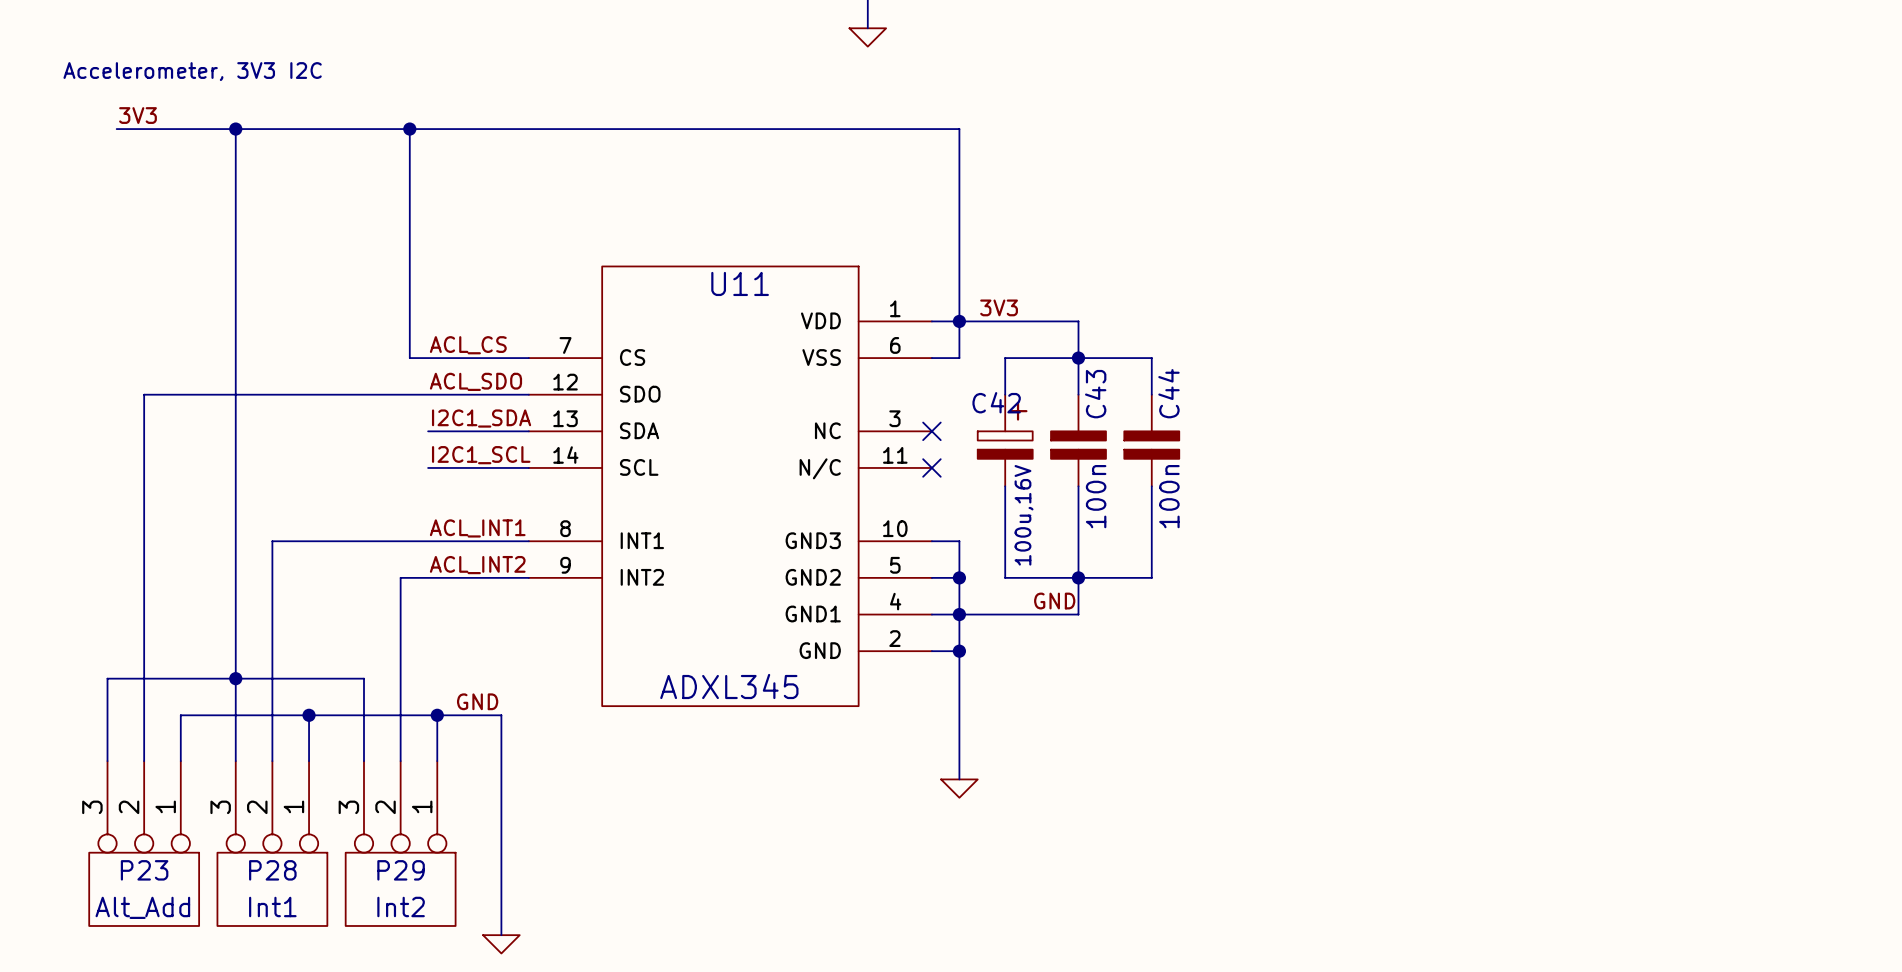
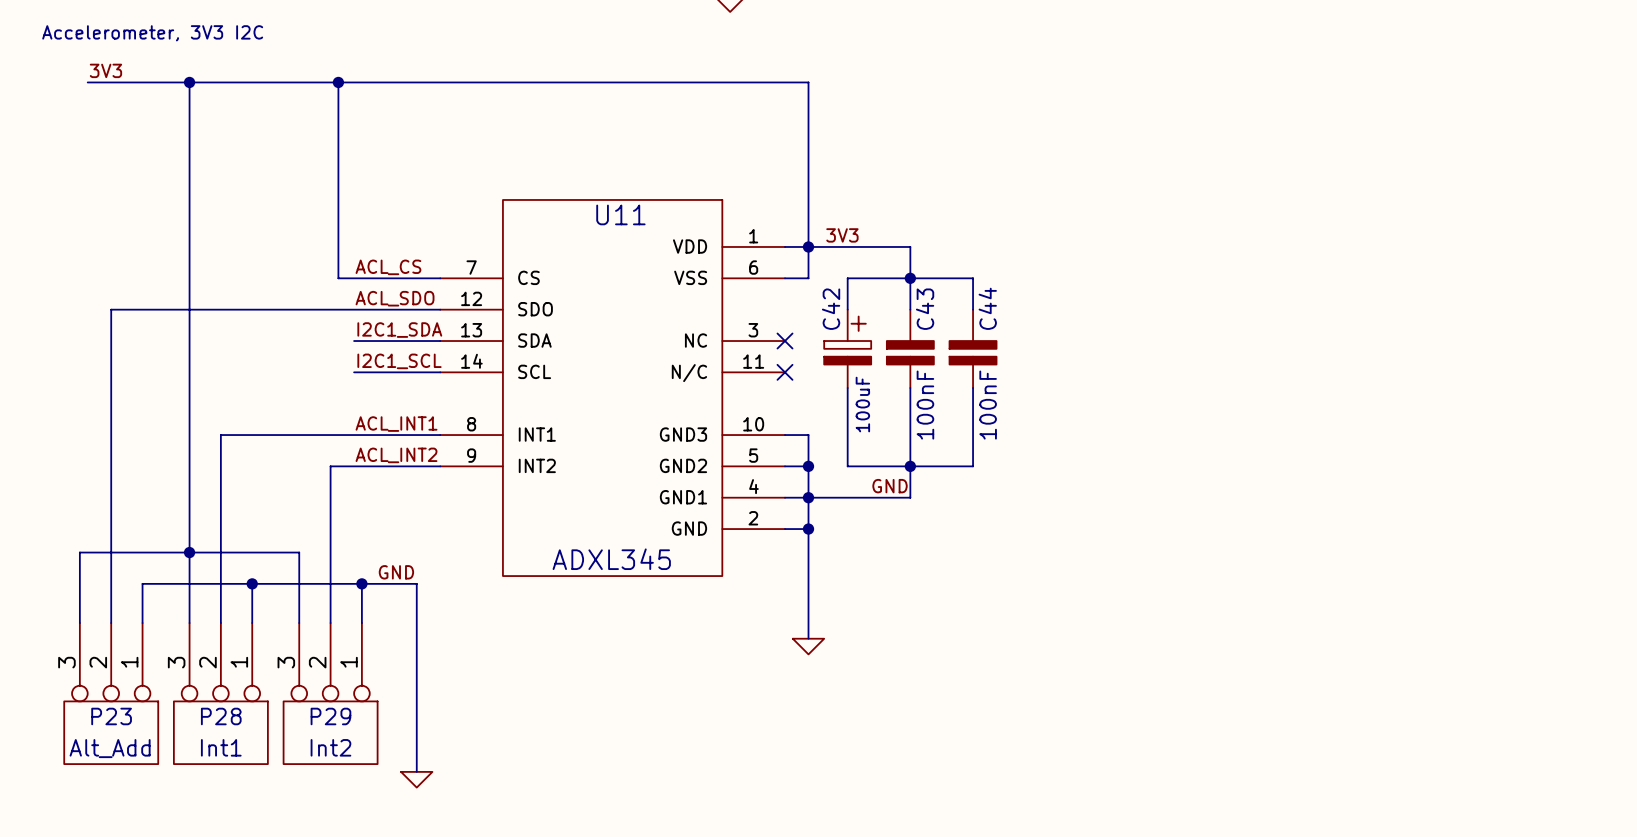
C42 name rotation: 0° (996, 402) -> 90° counterclockwise (831, 309)
C43 value: 100n (1096, 496) -> 100nF (925, 405)
C44 value: 100n (1169, 496) -> 100nF (988, 405)
C42 value: 100u,16V (1024, 515) -> 100uF (862, 404)

